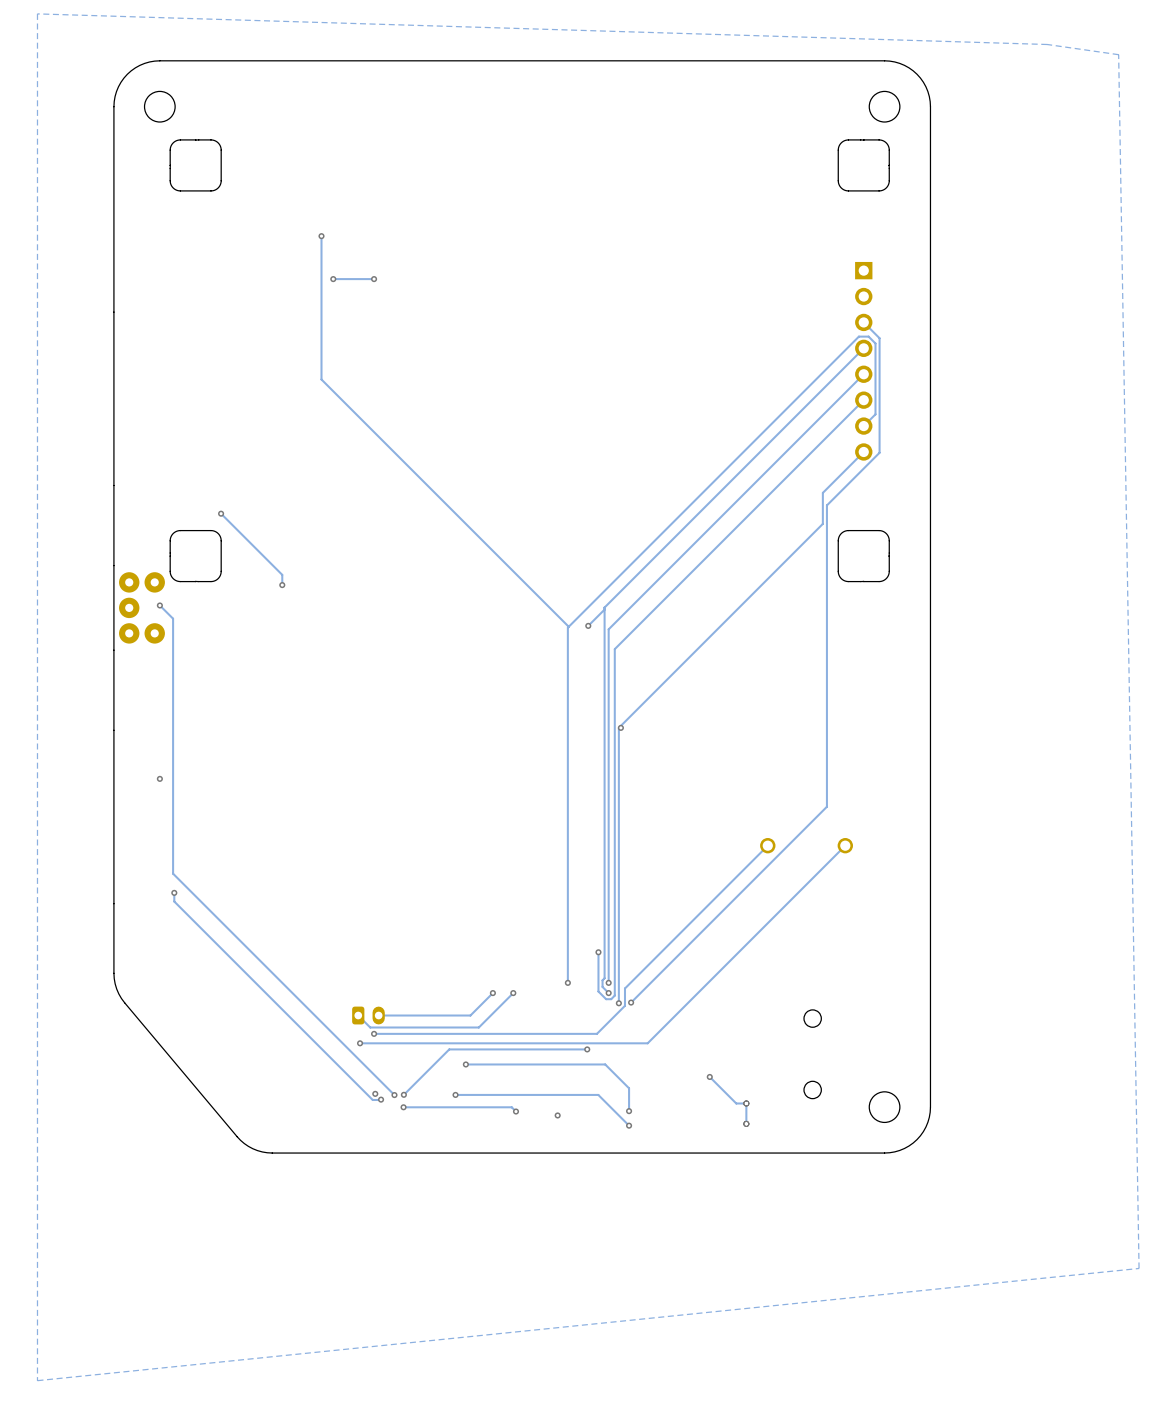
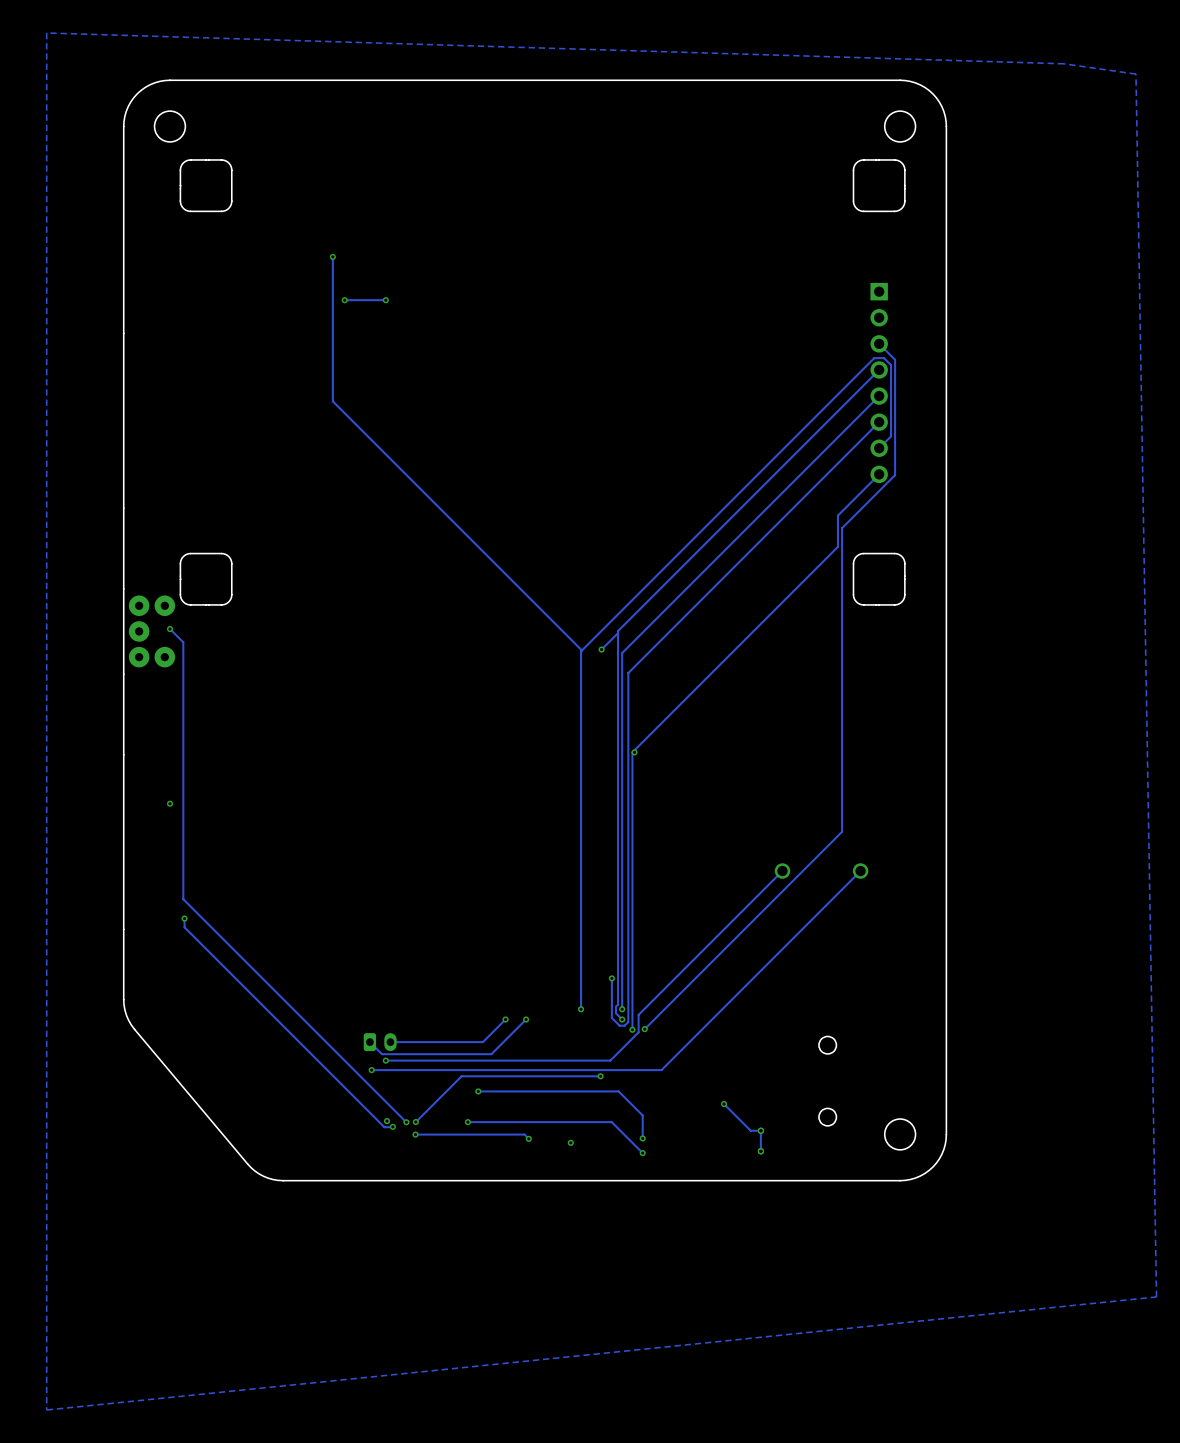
track: (221, 513) (282, 574) (282, 585) -> none
via: (221, 513) -> none
via: (282, 585) -> none

